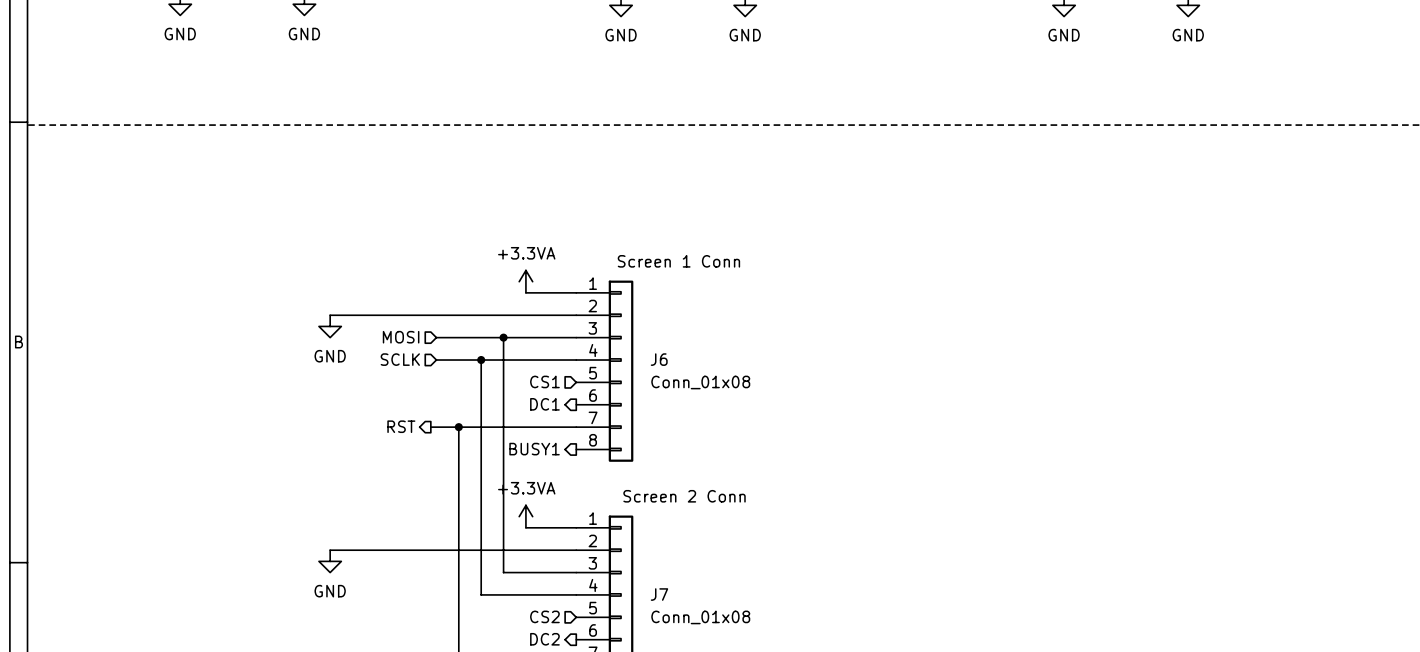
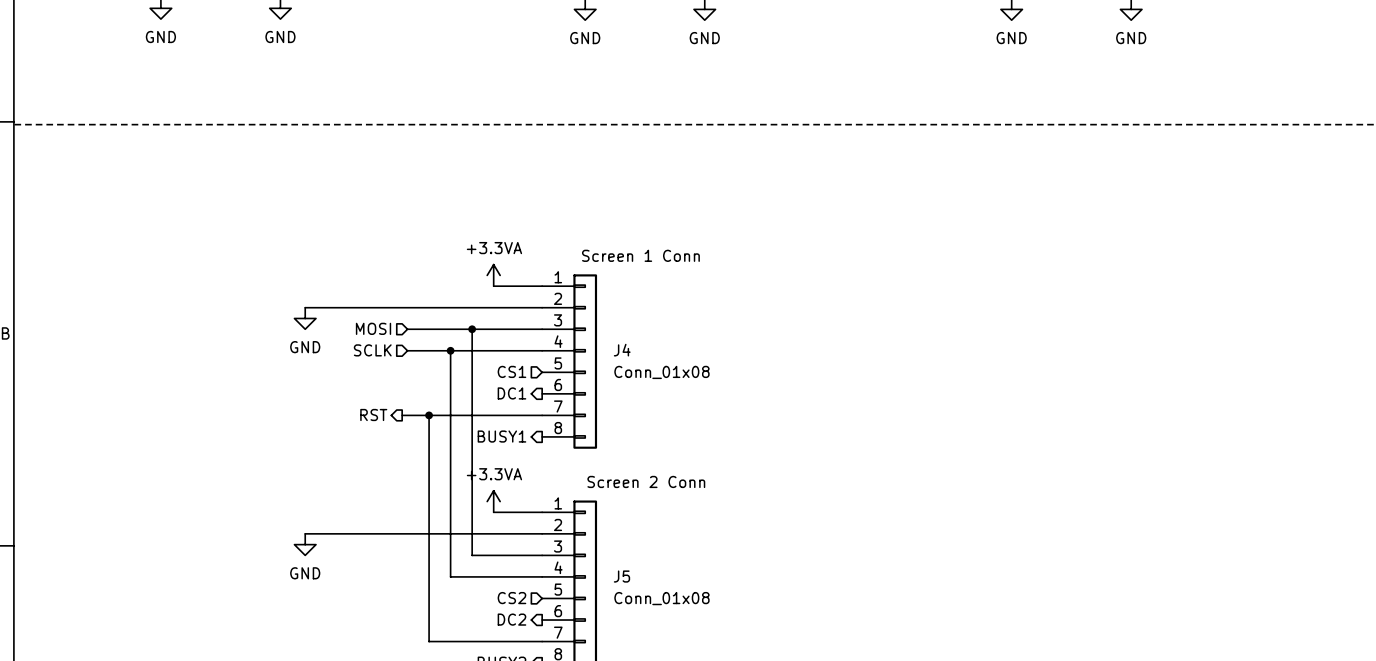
J6 name: J6 (659, 359) -> J4 (622, 350)
J7 name: J7 (659, 594) -> J5 (621, 576)

